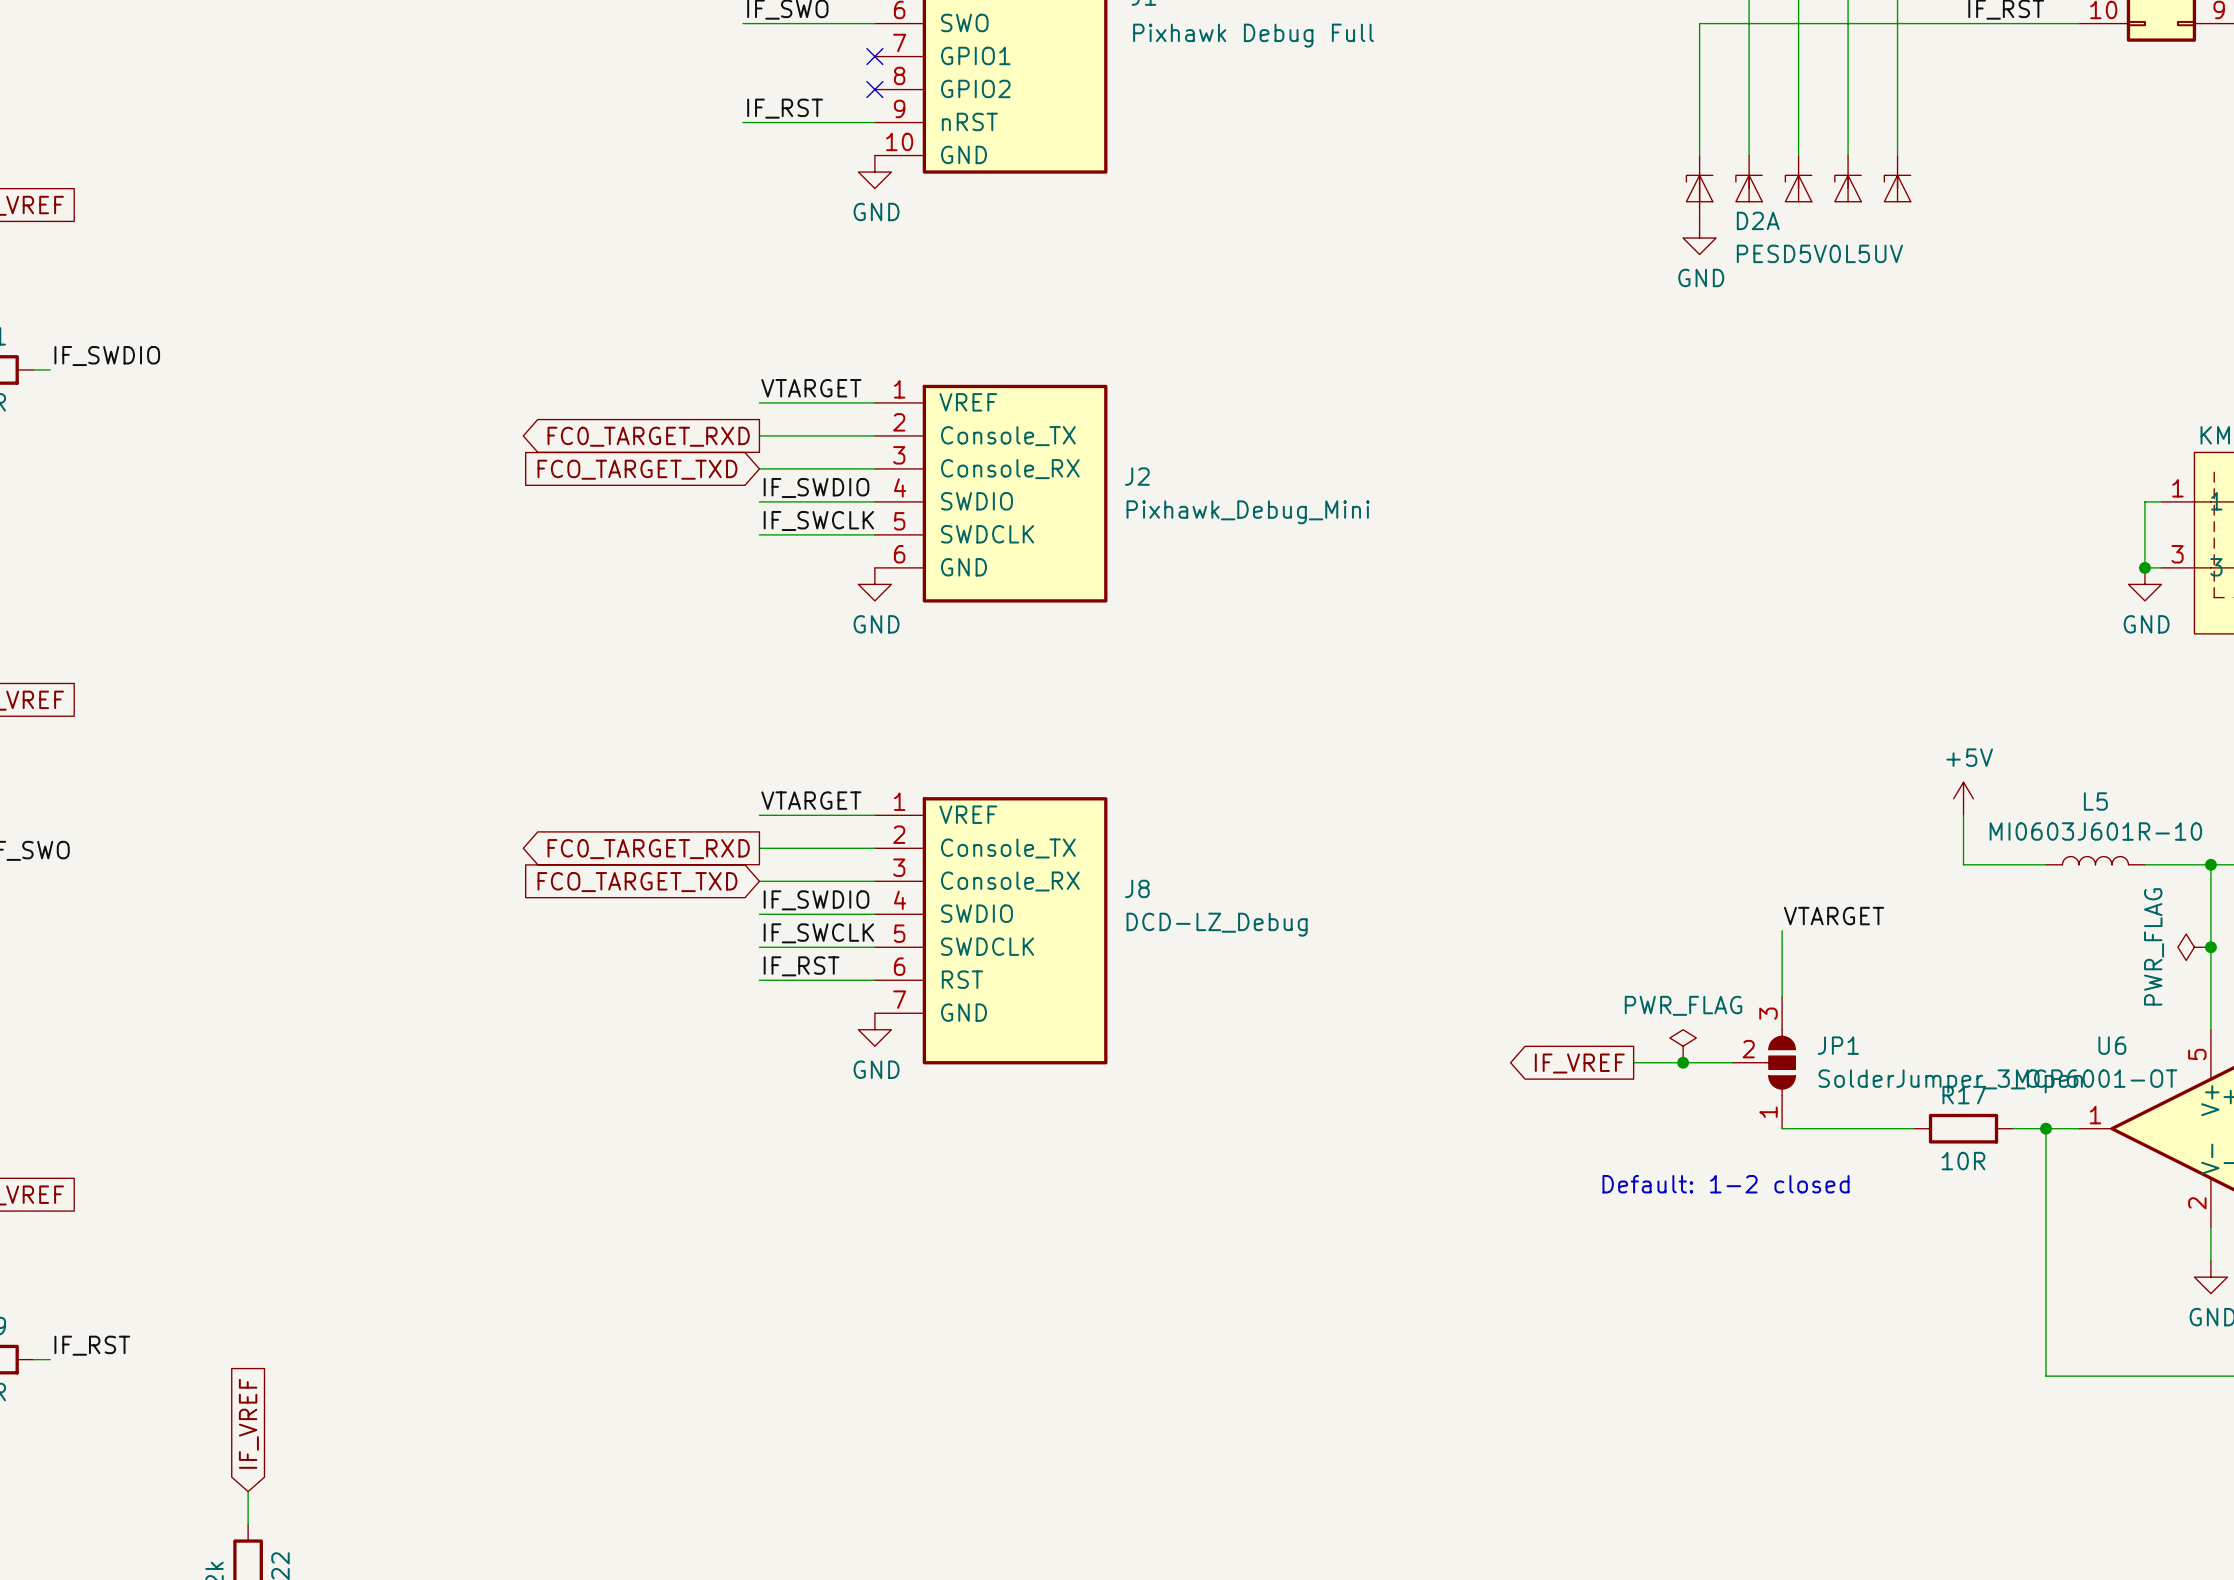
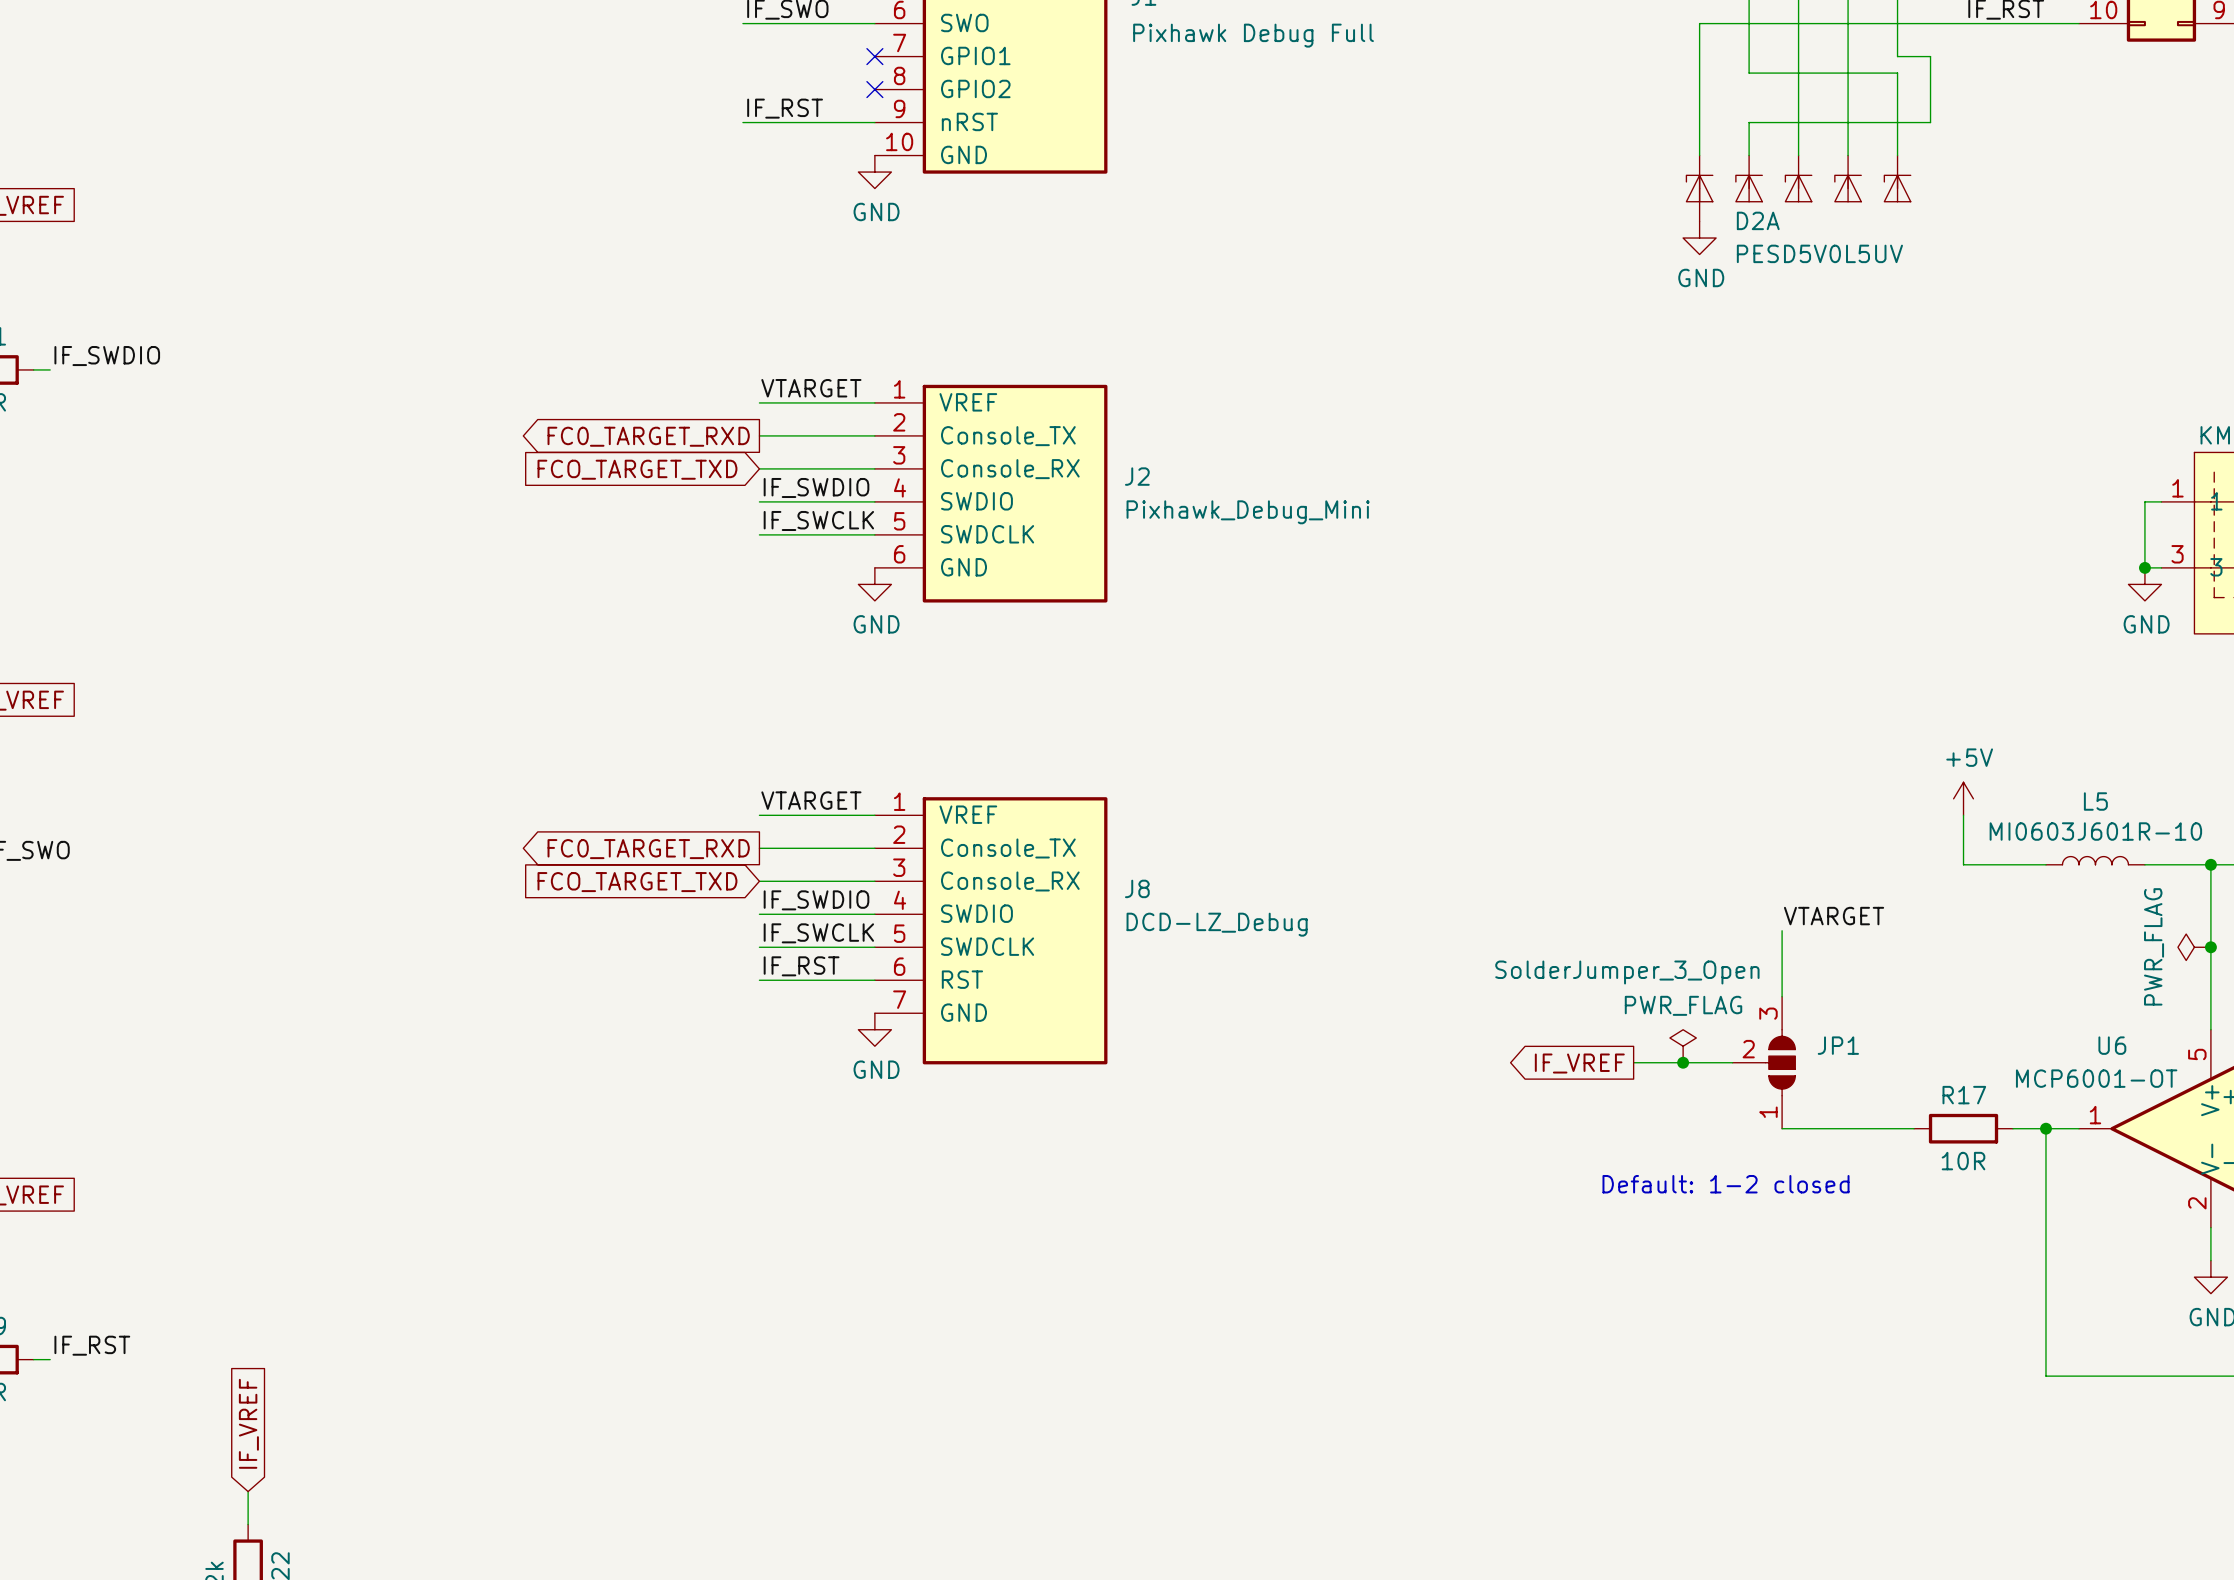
wire: (1897, 56) (1897, 73) -> (1749, 73) (1897, 73)
wire: (1749, 73) (1749, 122) -> (1897, 56) (1930, 56) (1930, 122) (1749, 122)
JP1 value position: SolderJumper_3_Open (1950, 1081) -> SolderJumper_3_Open (1627, 972)

